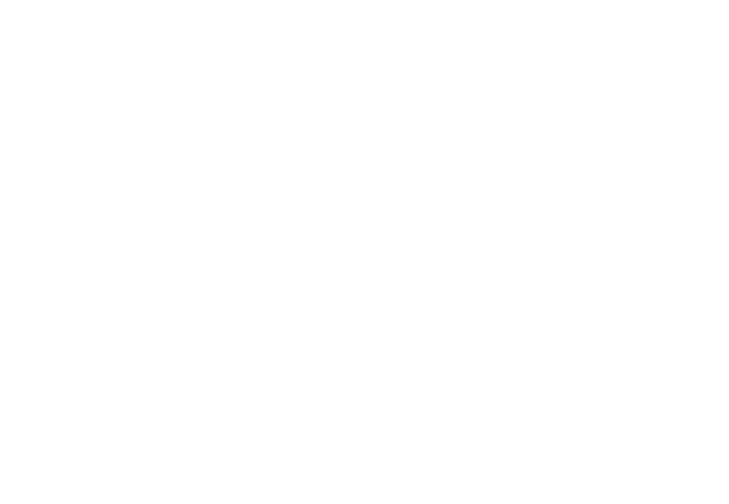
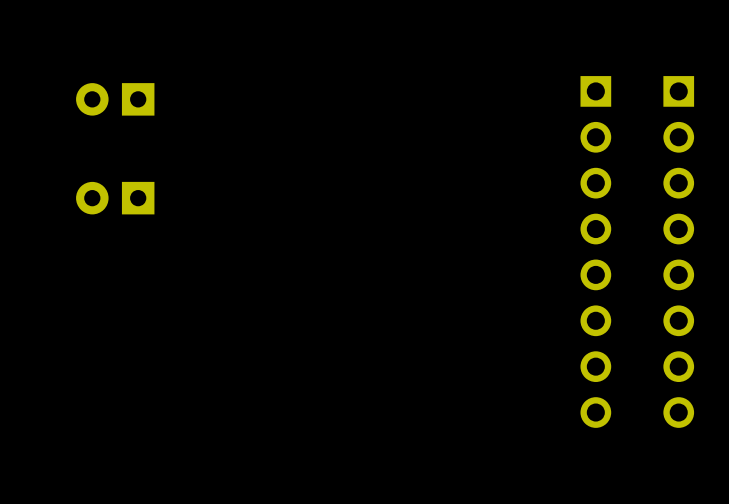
part: none -> (115, 99)
part: none -> (115, 198)
part: none -> (595, 251)
part: none -> (678, 251)

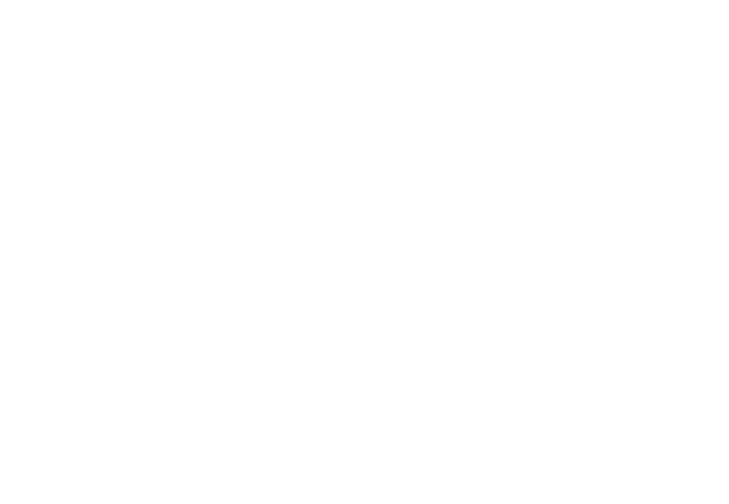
part: (115, 99) -> none
part: (115, 198) -> none
part: (595, 251) -> none
part: (678, 251) -> none

